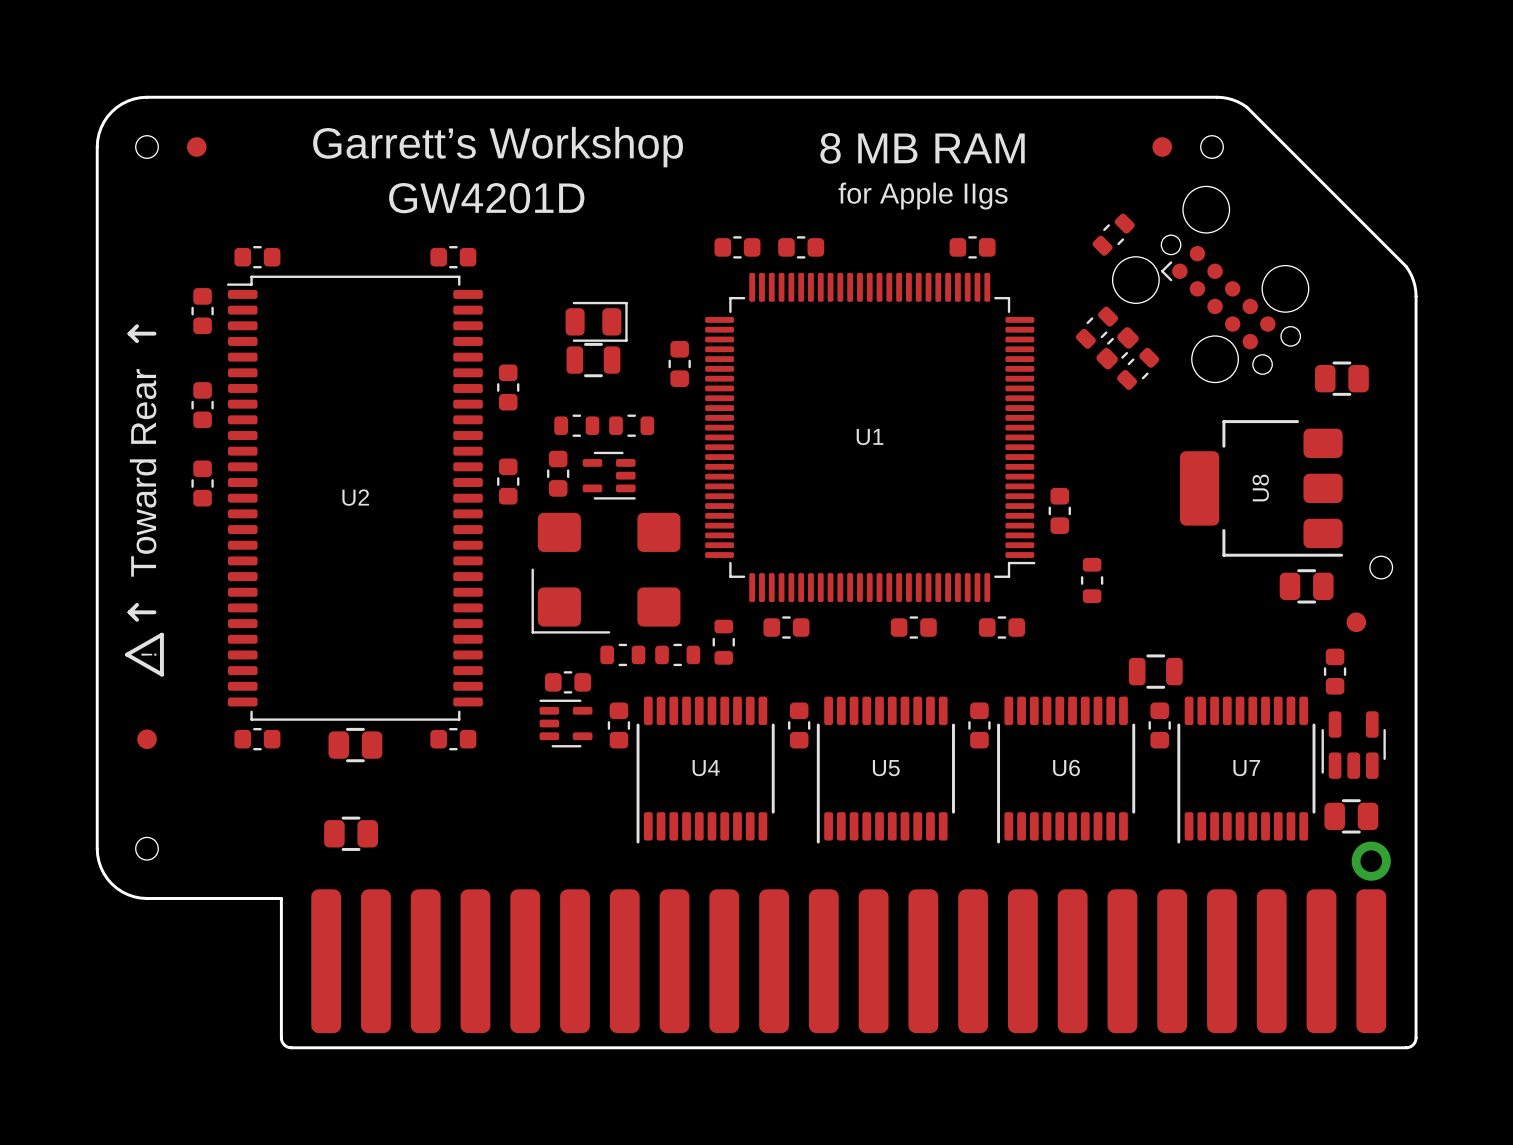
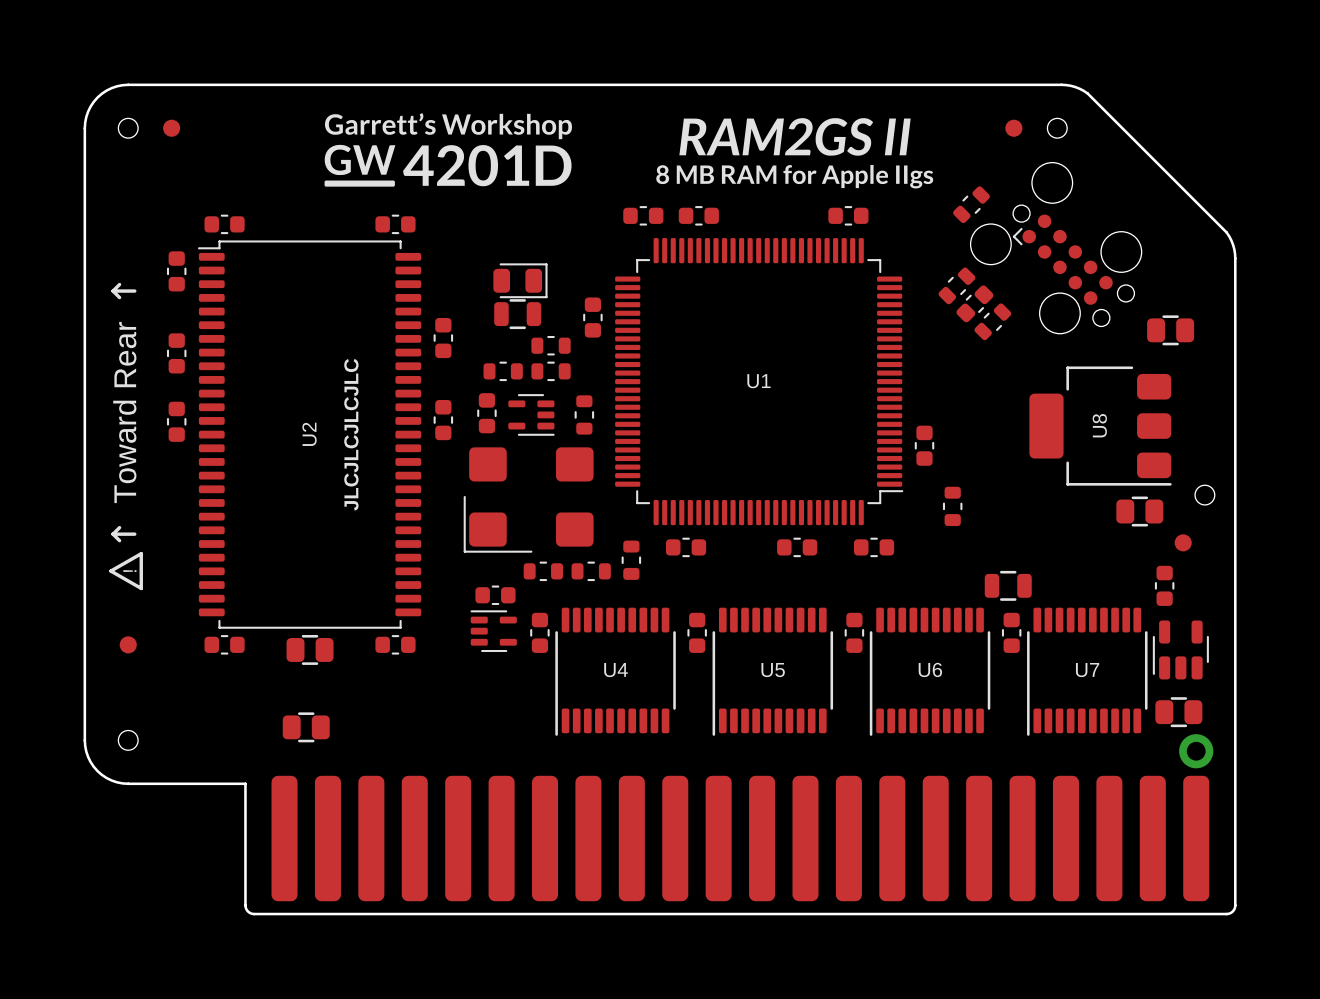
drawing: none -> [324, 113, 572, 187]
drawing: none -> [656, 118, 934, 189]
text: Garrett’s Workshop (498, 147) -> none
text: 8 MB RAM (922, 148) -> none
text: for Apple IIgs (923, 196) -> none
text: GW (424, 198) -> none
text: 4201D (522, 198) -> none
part: none -> (551, 345)
part: none -> (584, 414)
U2 name rotation: 0° (355, 497) -> 90° counterclockwise (309, 434)
text: none -> JLCJLCJLCJLC (351, 434)

